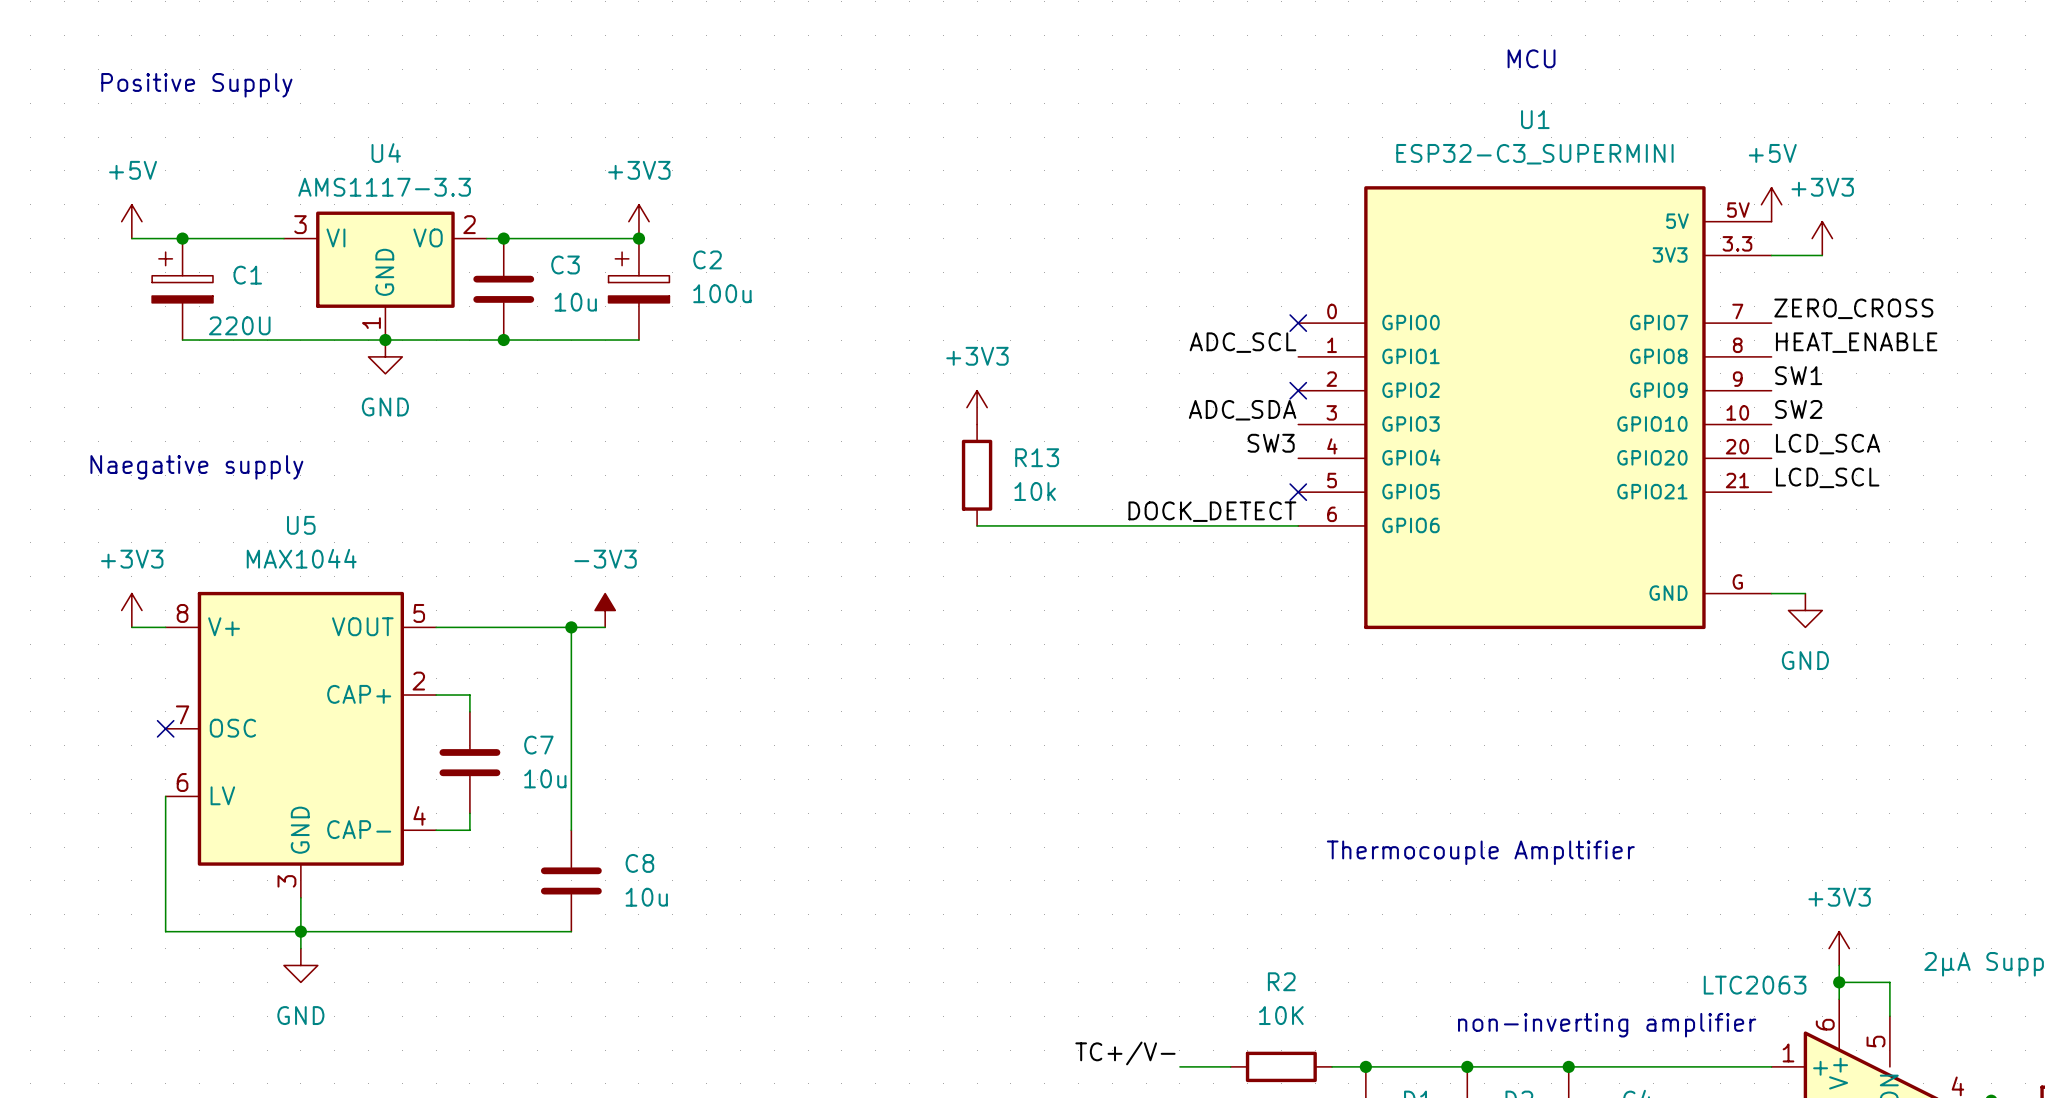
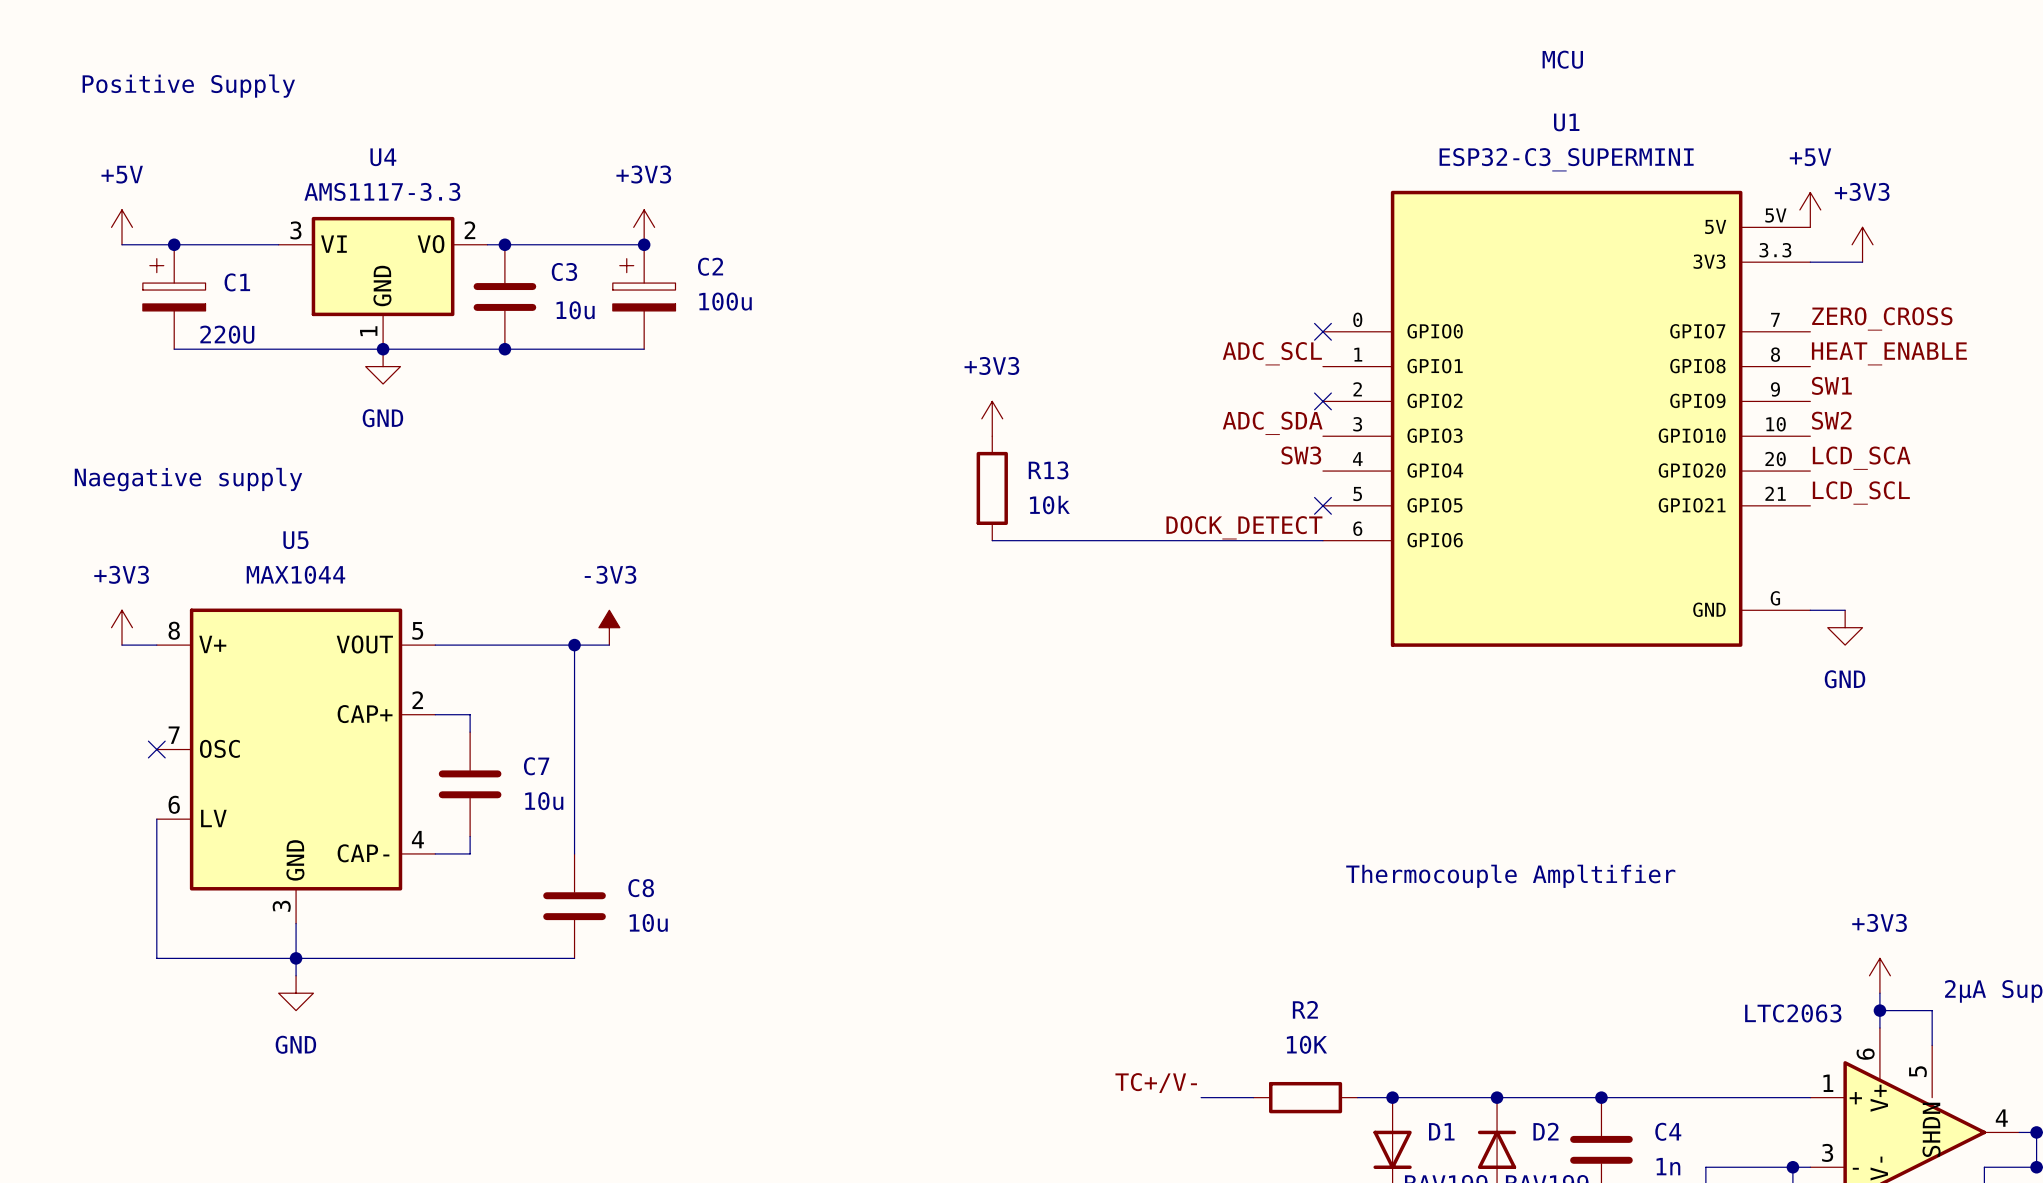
text: non-inverting amplifier (1607, 1025) -> none

